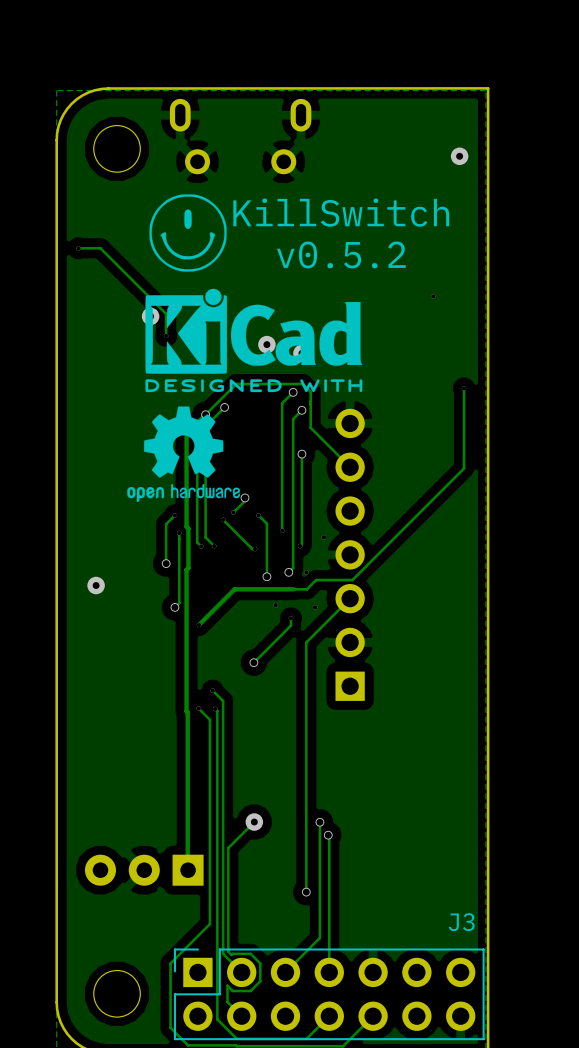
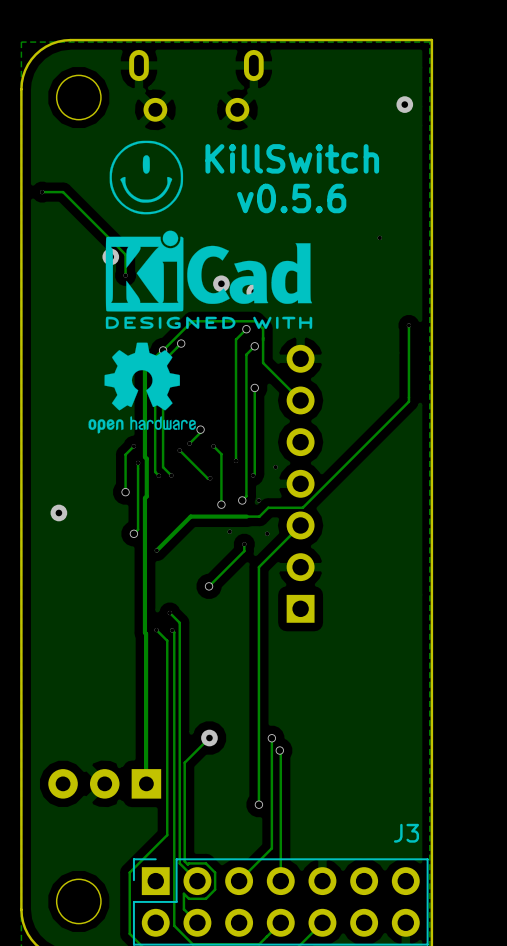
text: v0.5.2 (341, 254) -> v0.5.6 (291, 198)

